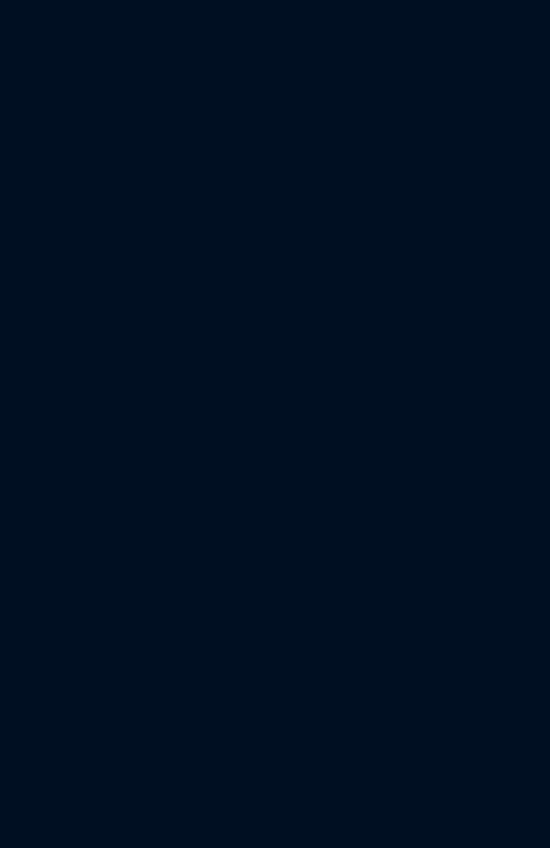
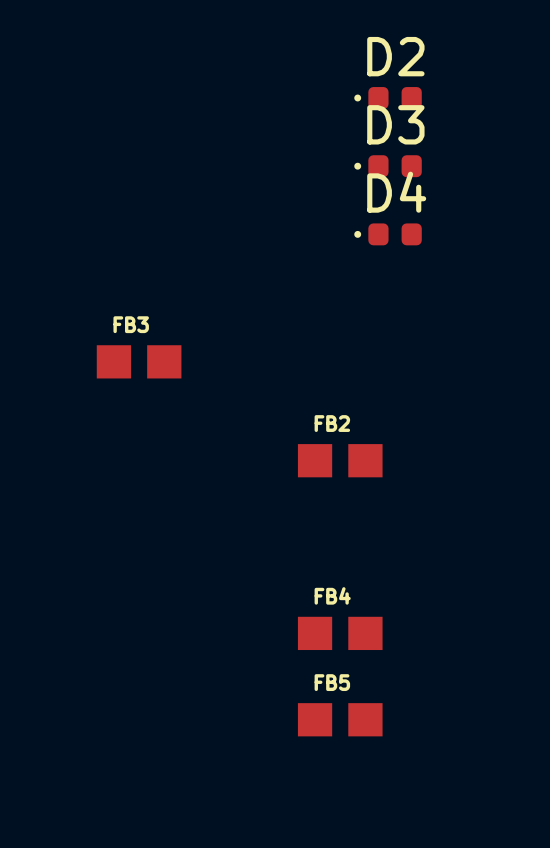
D2: none -> (388, 98)
D3: none -> (388, 166)
D4: none -> (388, 234)
FB3: none -> (139, 361)
FB2: none -> (340, 460)
FB4: none -> (340, 633)
FB5: none -> (340, 719)

